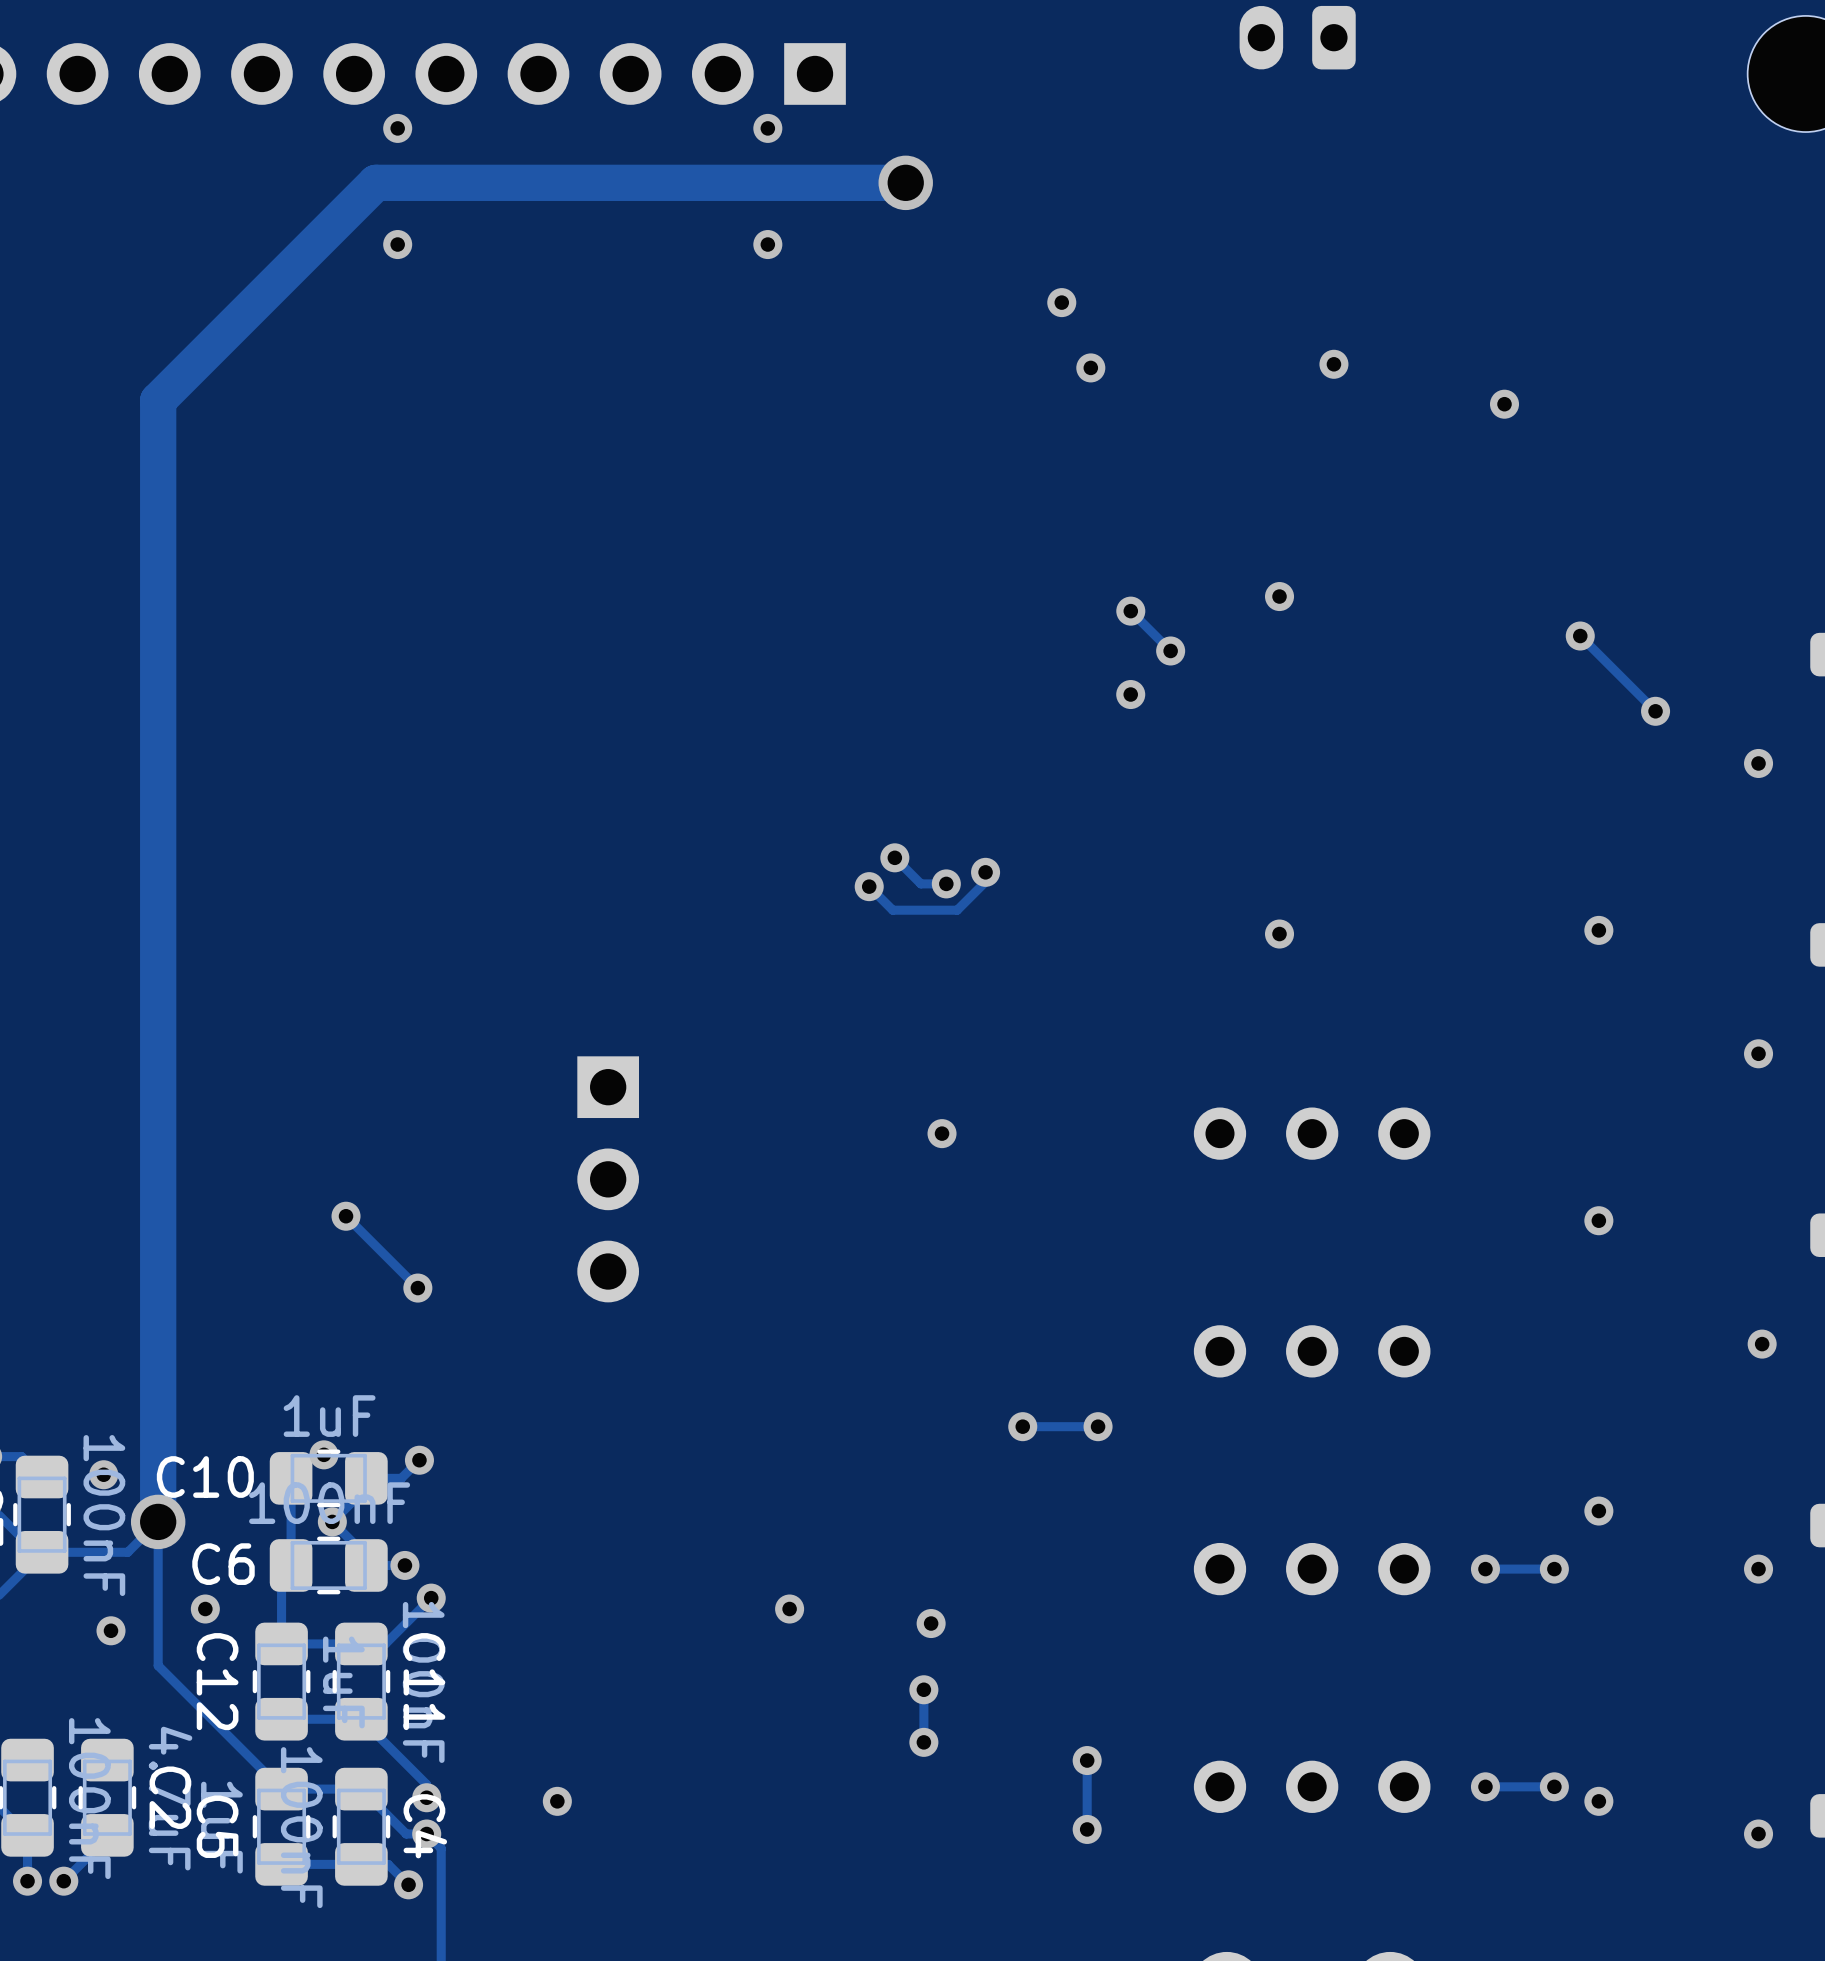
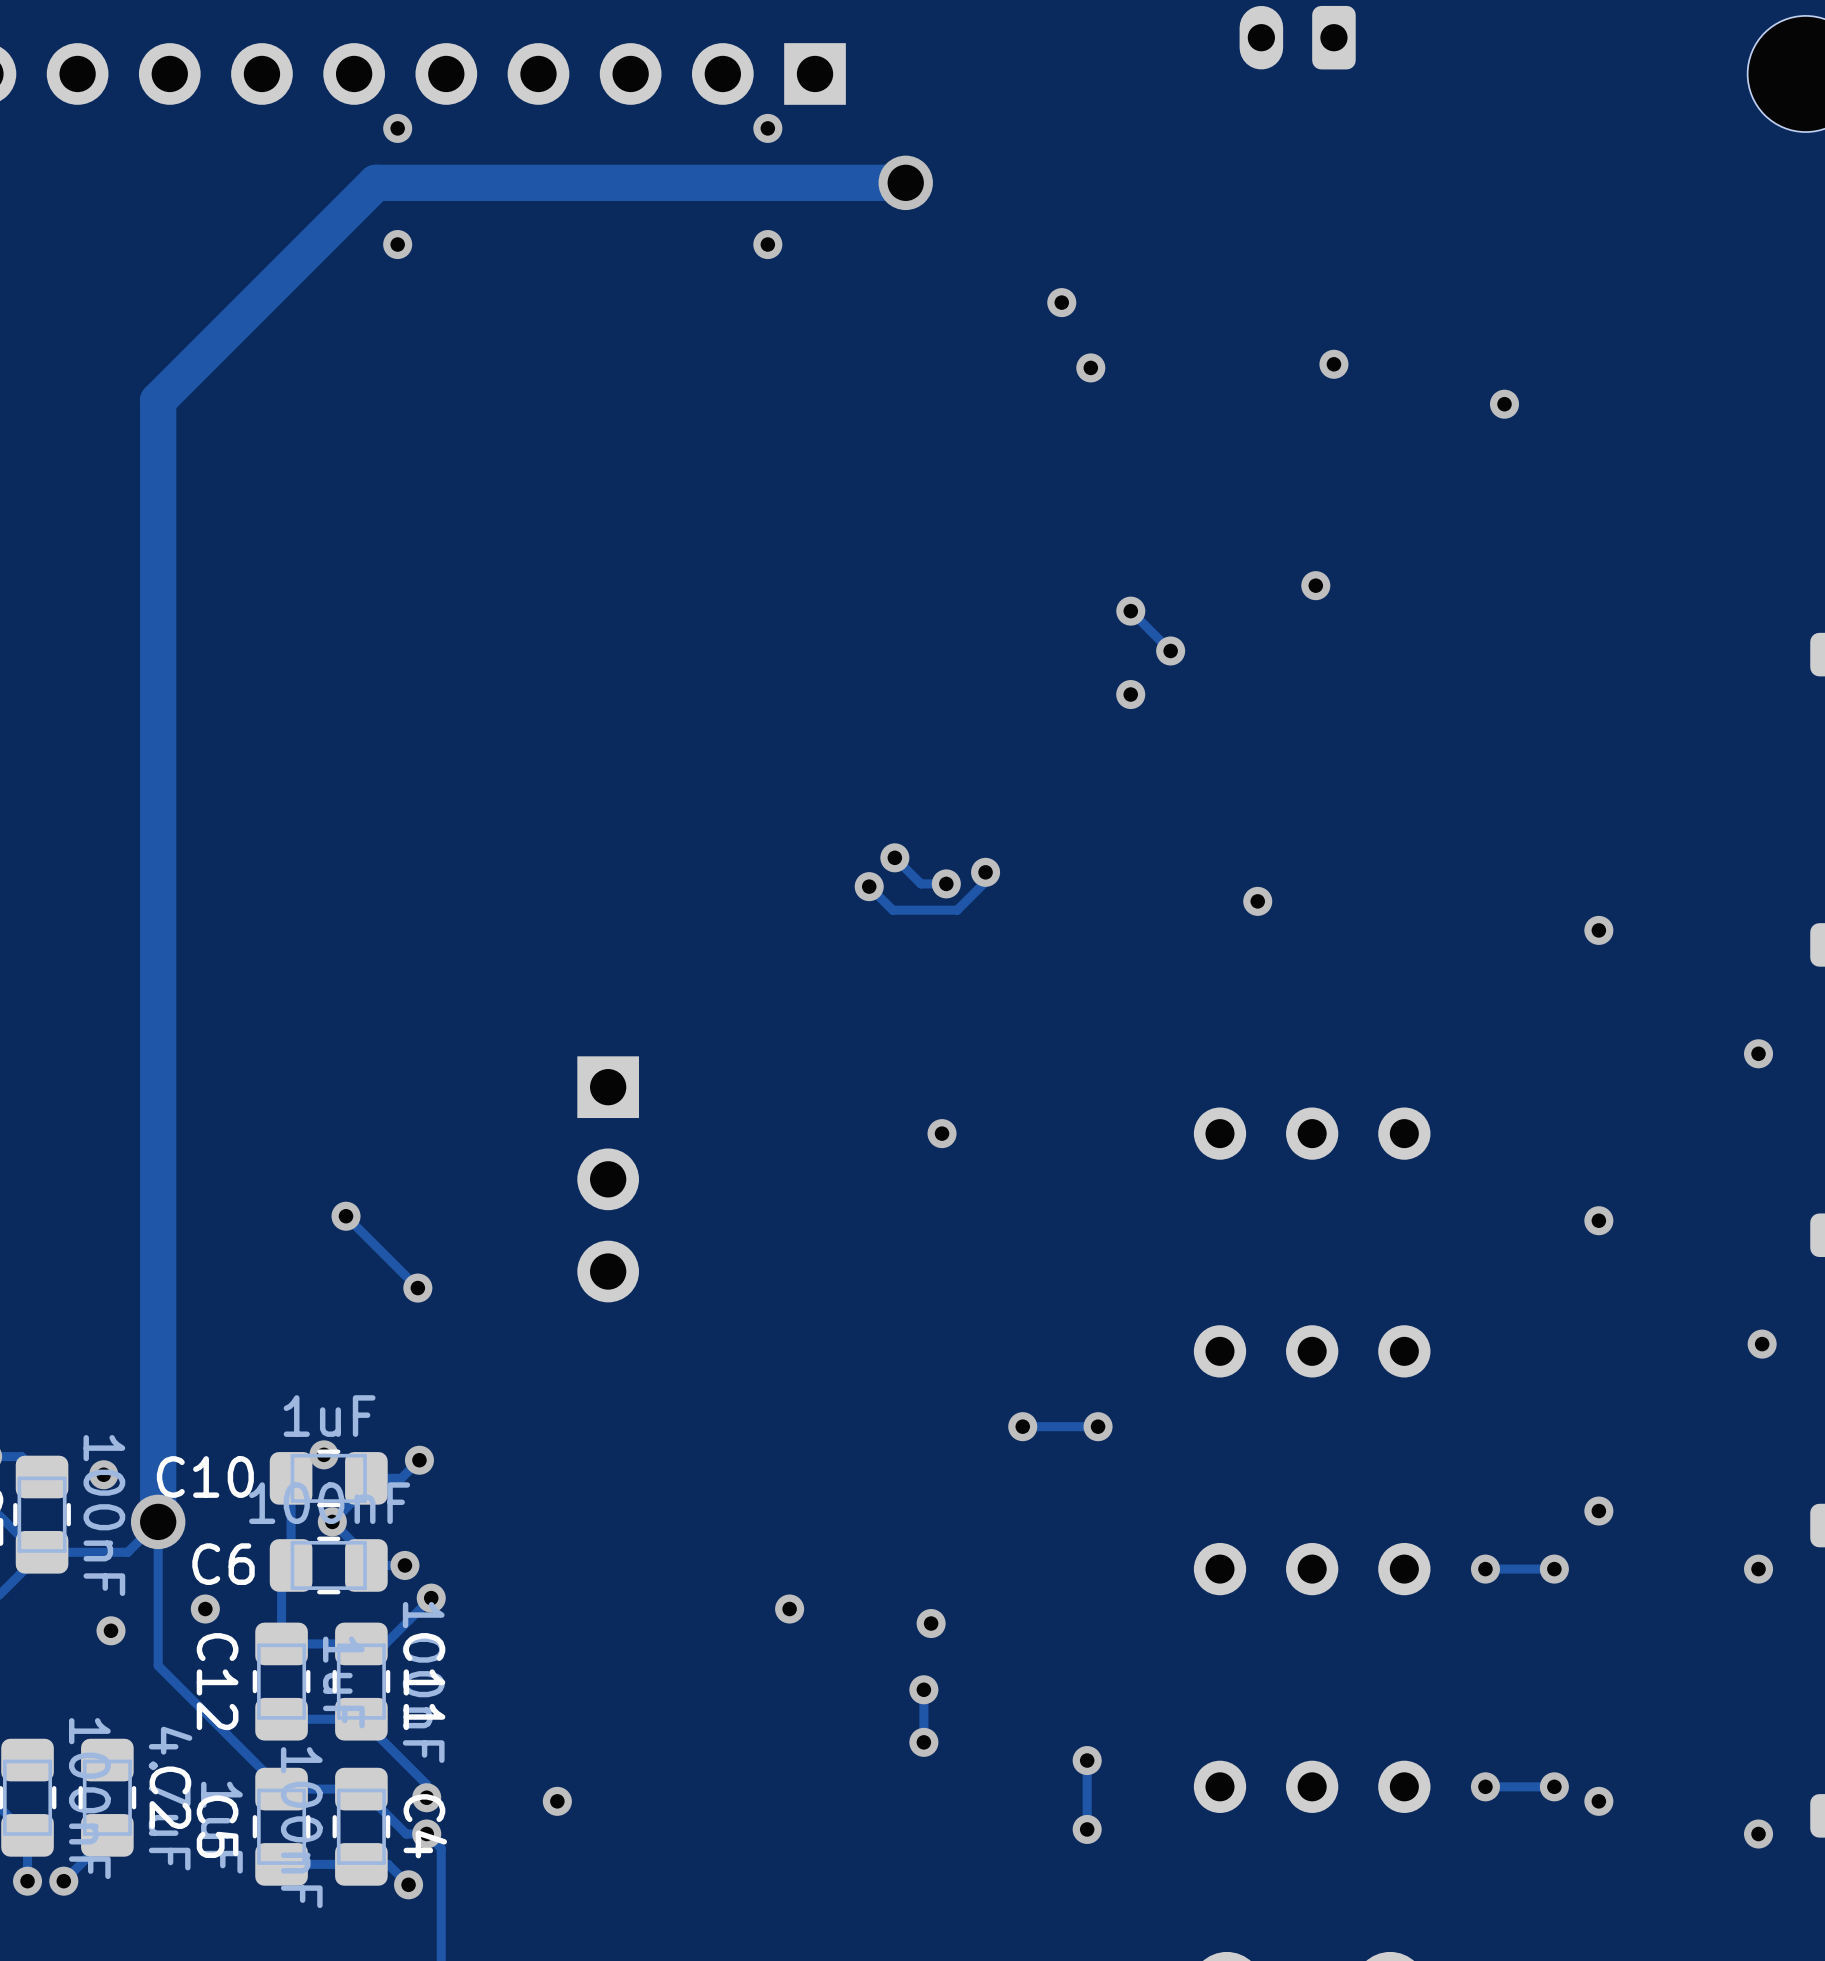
via position: (1279, 596) -> (1315, 585)
track: (1580, 636) (1655, 711) -> none
via: (1580, 636) -> none
via: (1655, 711) -> none
via: (1758, 763) -> none
via position: (1279, 934) -> (1257, 901)

